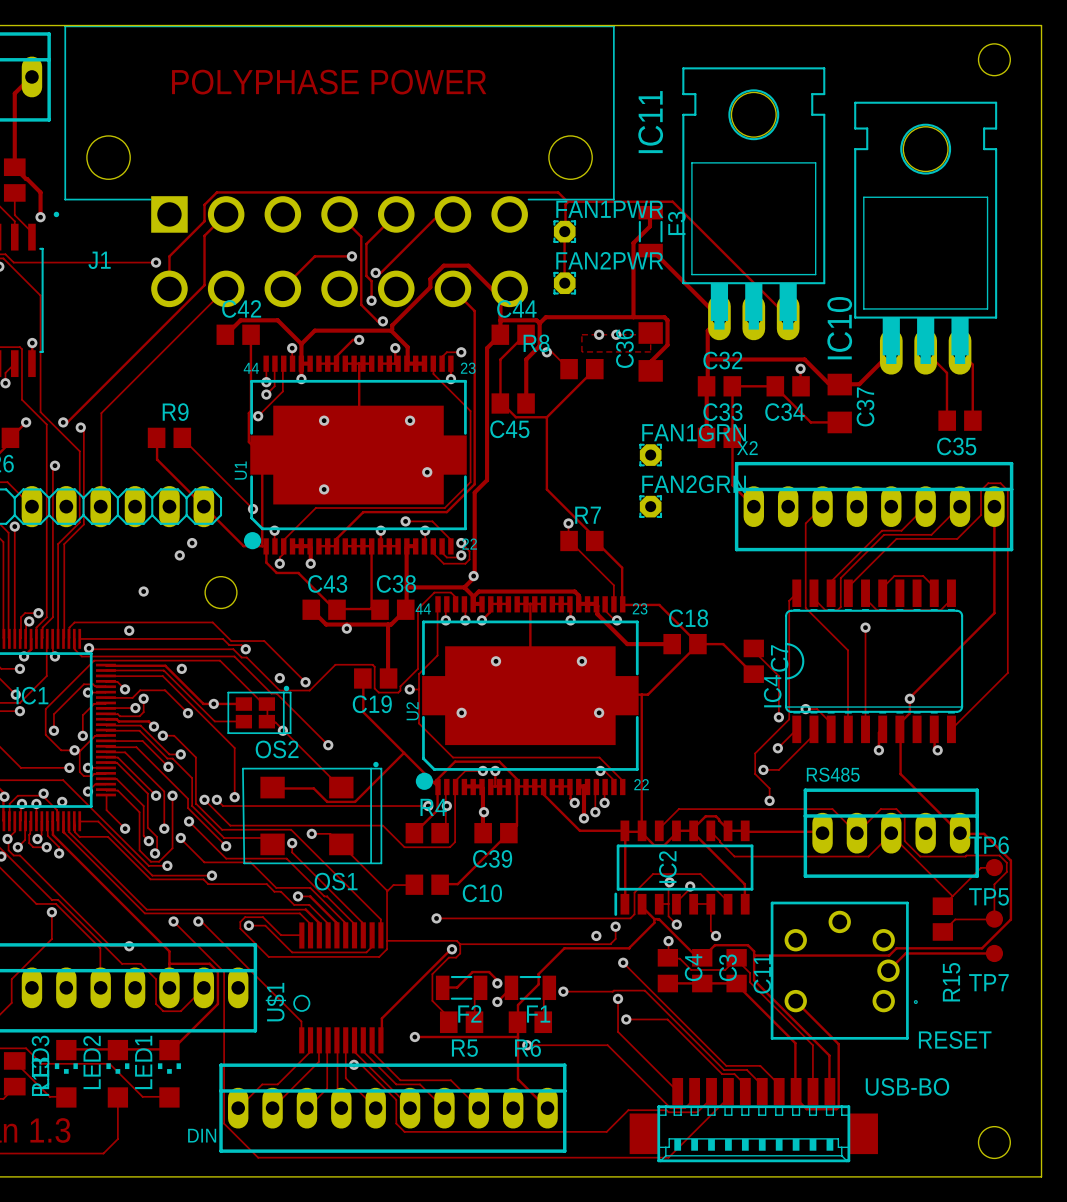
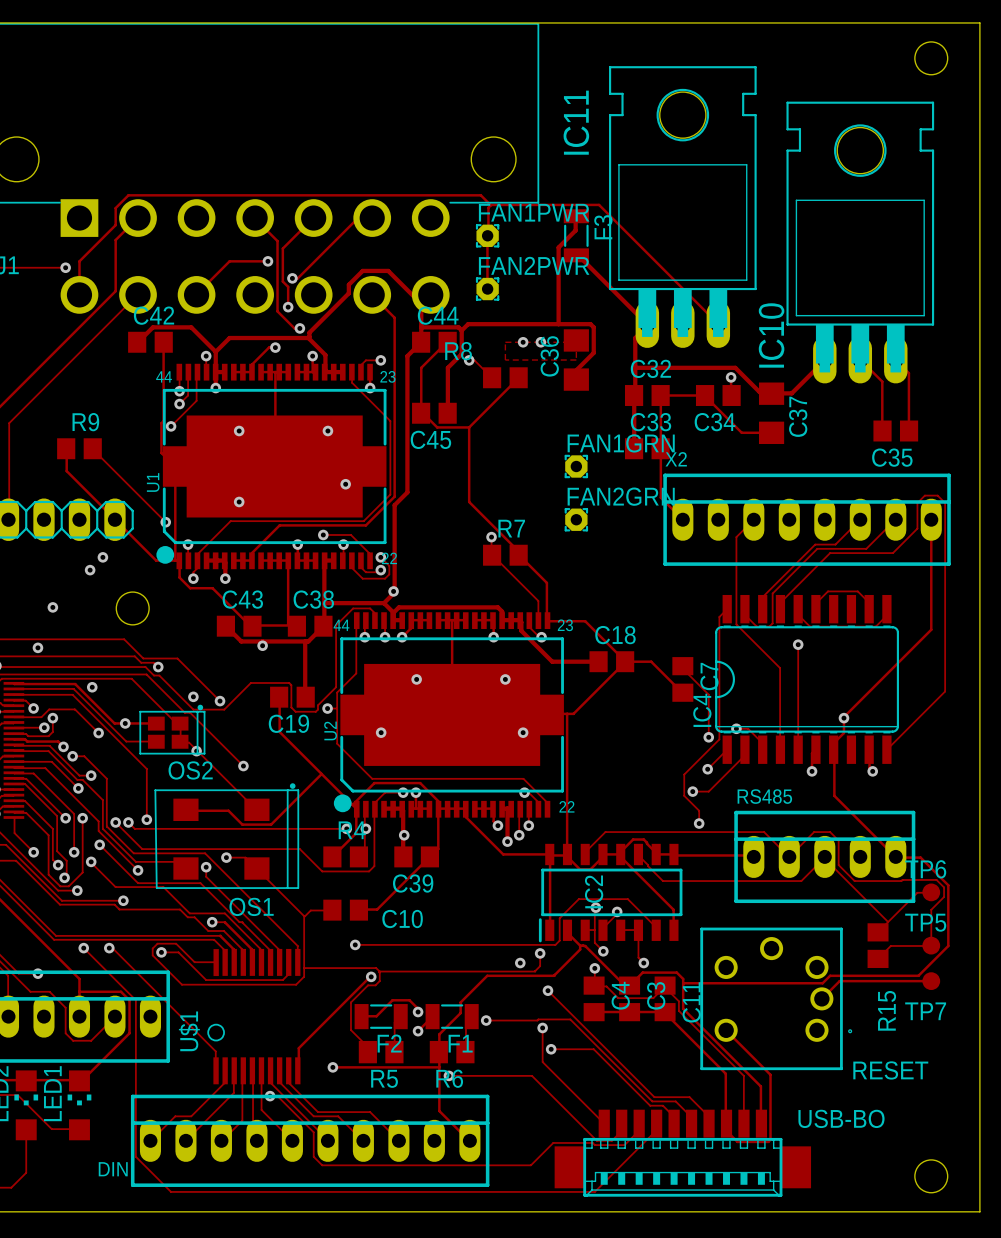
text: POLYPHASE POWER (329, 82) -> none

